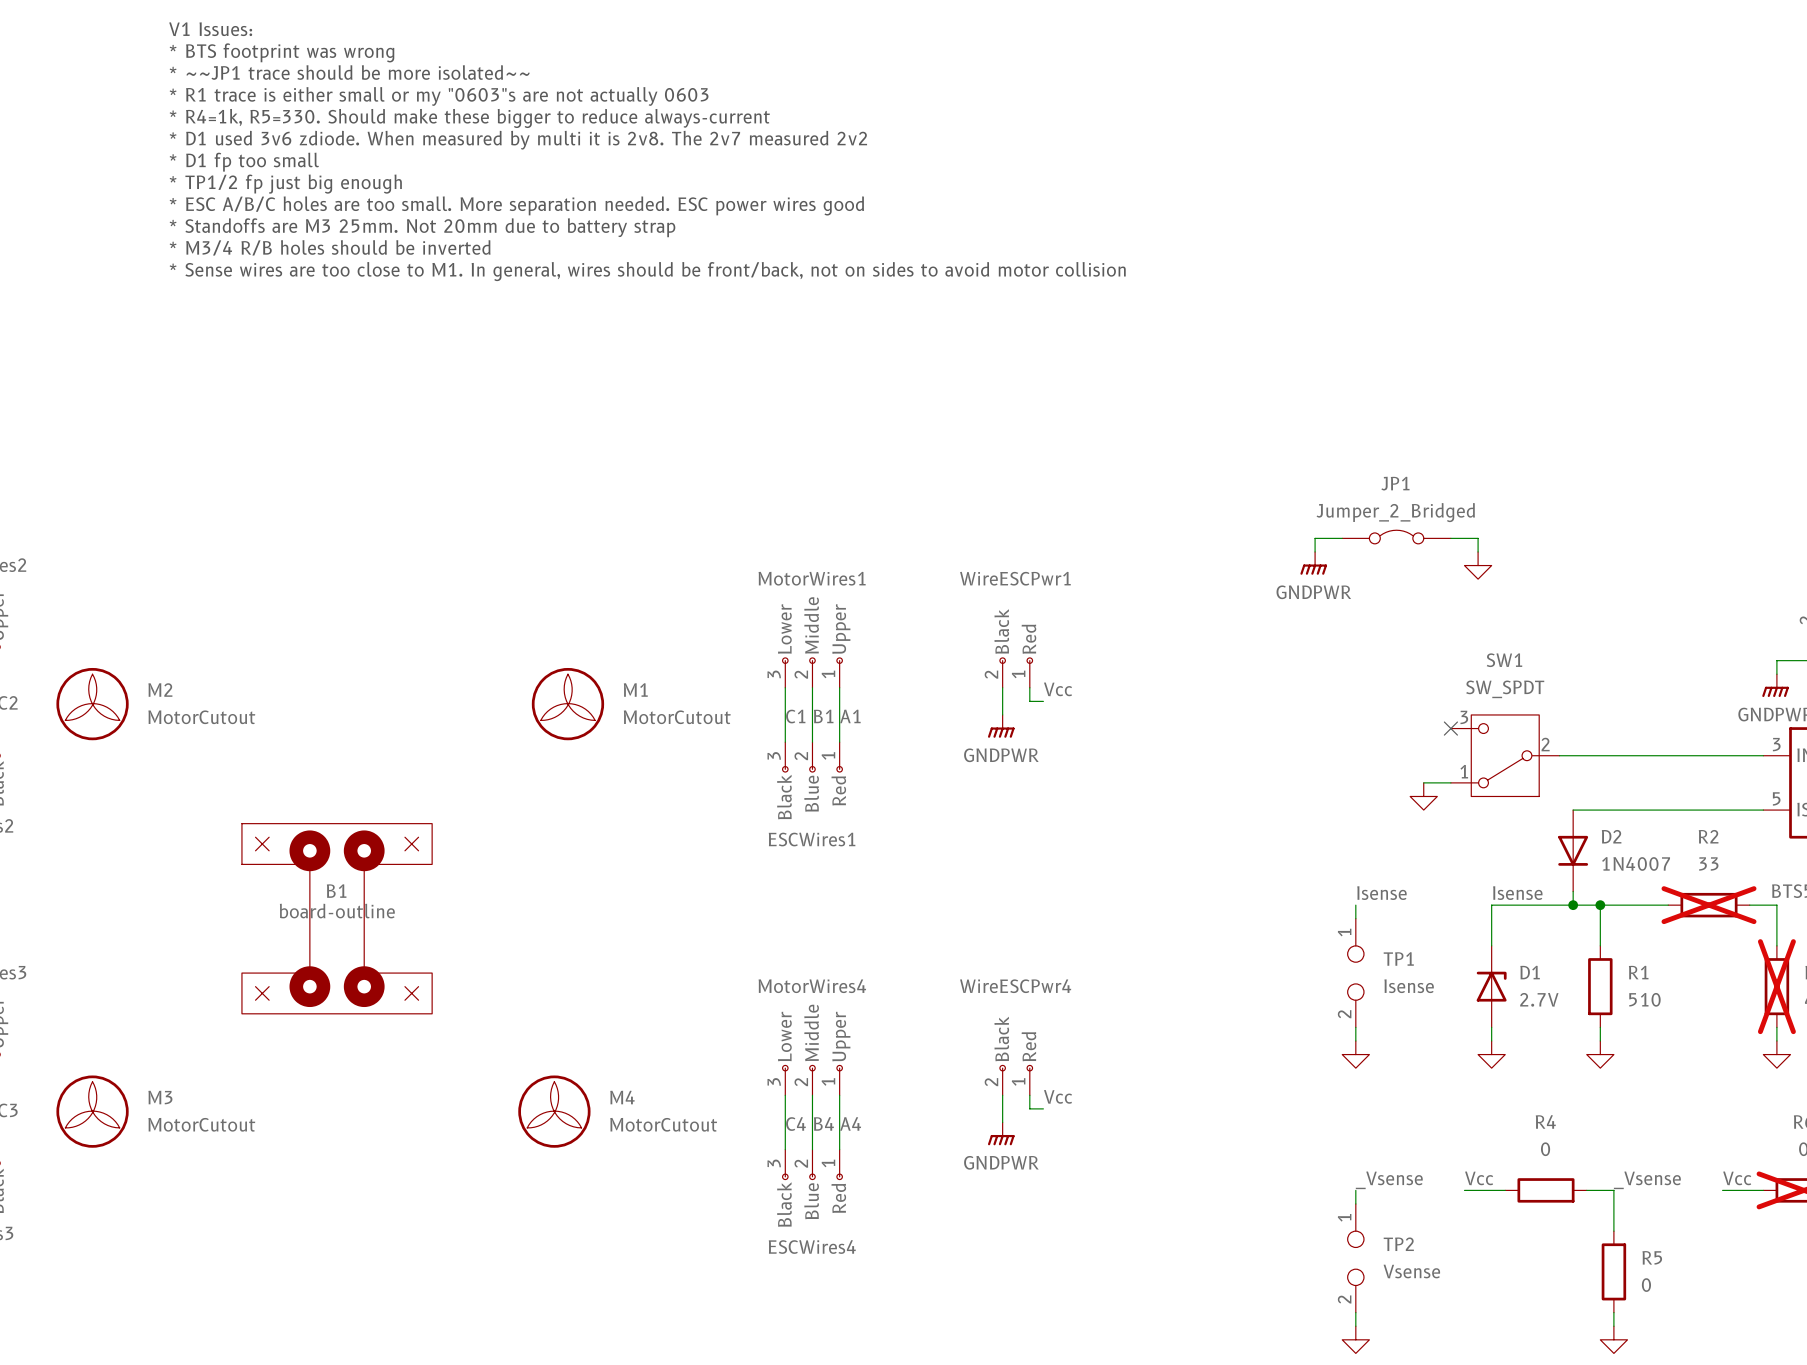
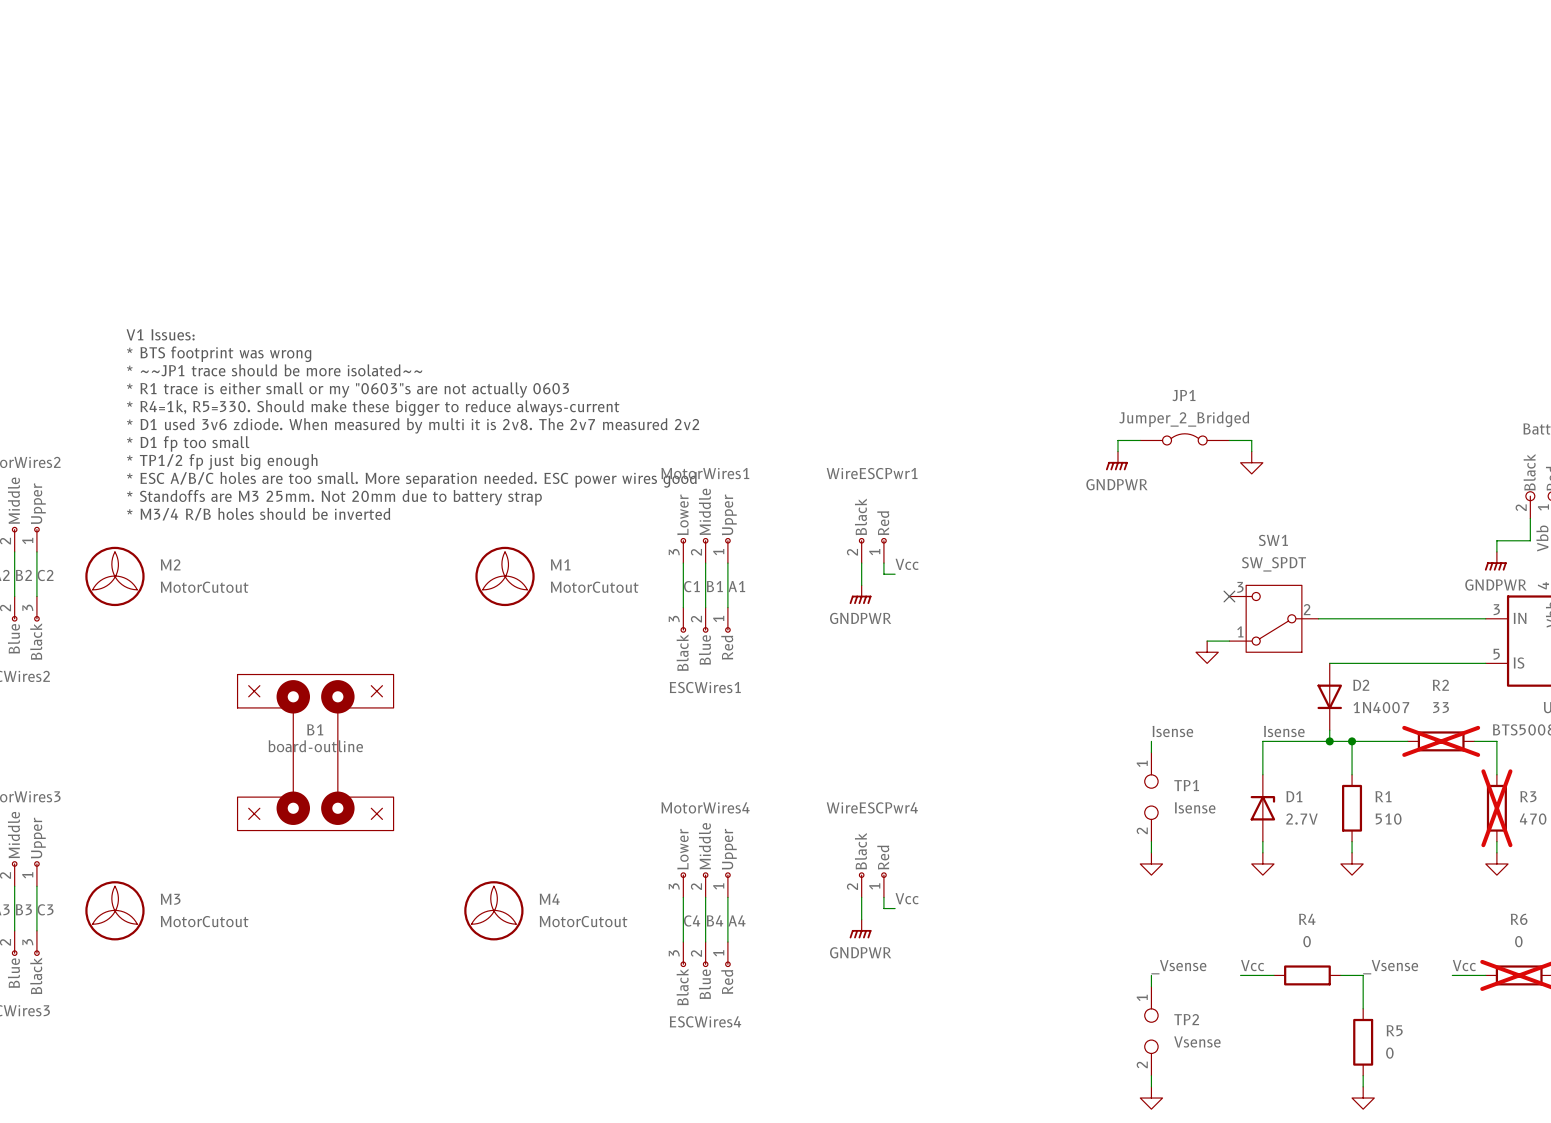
text: V1 Issues: (210, 29) -> none
text: * BTS footprint was wrong (282, 52) -> none
text: * ~~JP1 trace should be more isolated~~ (349, 72) -> none
text: * R1 trace is either small or my "0603"s are not actually 0603 (439, 96) -> none
text: * R4=1k, R5=330. Should make these bigger to reduce always-current (469, 118) -> none
text: * D1 used 3v6 zdiode. When measured by multi it is 2v8. The 2v7 measured 2v2 (518, 140) -> none
text: * D1 fp too small (244, 162) -> none
text: * TP1/2 fp just big enough (285, 184) -> none
text: * ESC A/B/C holes are too small. More separation needed. ESC power wires good (516, 205) -> none
text: * Standoffs are M3 25mm. Not 20mm due to battery strap (422, 227) -> none
text: * M3/4 R/B holes should be inverted (330, 247) -> none
text: * Sense wires are too close to M1. In general, wires should be front/back, not on sides to avoid motor collision (647, 271) -> none
text: none -> V1 Issues: (160, 334)
text: none -> * BTS footprint was wrong (219, 354)
text: none -> * ~~JP1 trace should be more isolated~~ (274, 370)
text: none -> * R1 trace is either small or my "0603"s are not actually 0603 (348, 390)
text: none -> * R4=1k, R5=330. Should make these bigger to reduce always-current (373, 408)
text: none -> * D1 used 3v6 zdiode. When measured by multi it is 2v8. The 2v7 measured 2v2 (413, 425)
text: none -> * D1 fp too small (188, 443)
text: none -> * TP1/2 fp just big enough (222, 461)
text: none -> * ESC A/B/C holes are too small. More separation needed. ESC power wires good (411, 479)
text: none -> * Standoffs are M3 25mm. Not 20mm due to battery strap (334, 497)
text: none -> * M3/4 R/B holes should be inverted (258, 514)

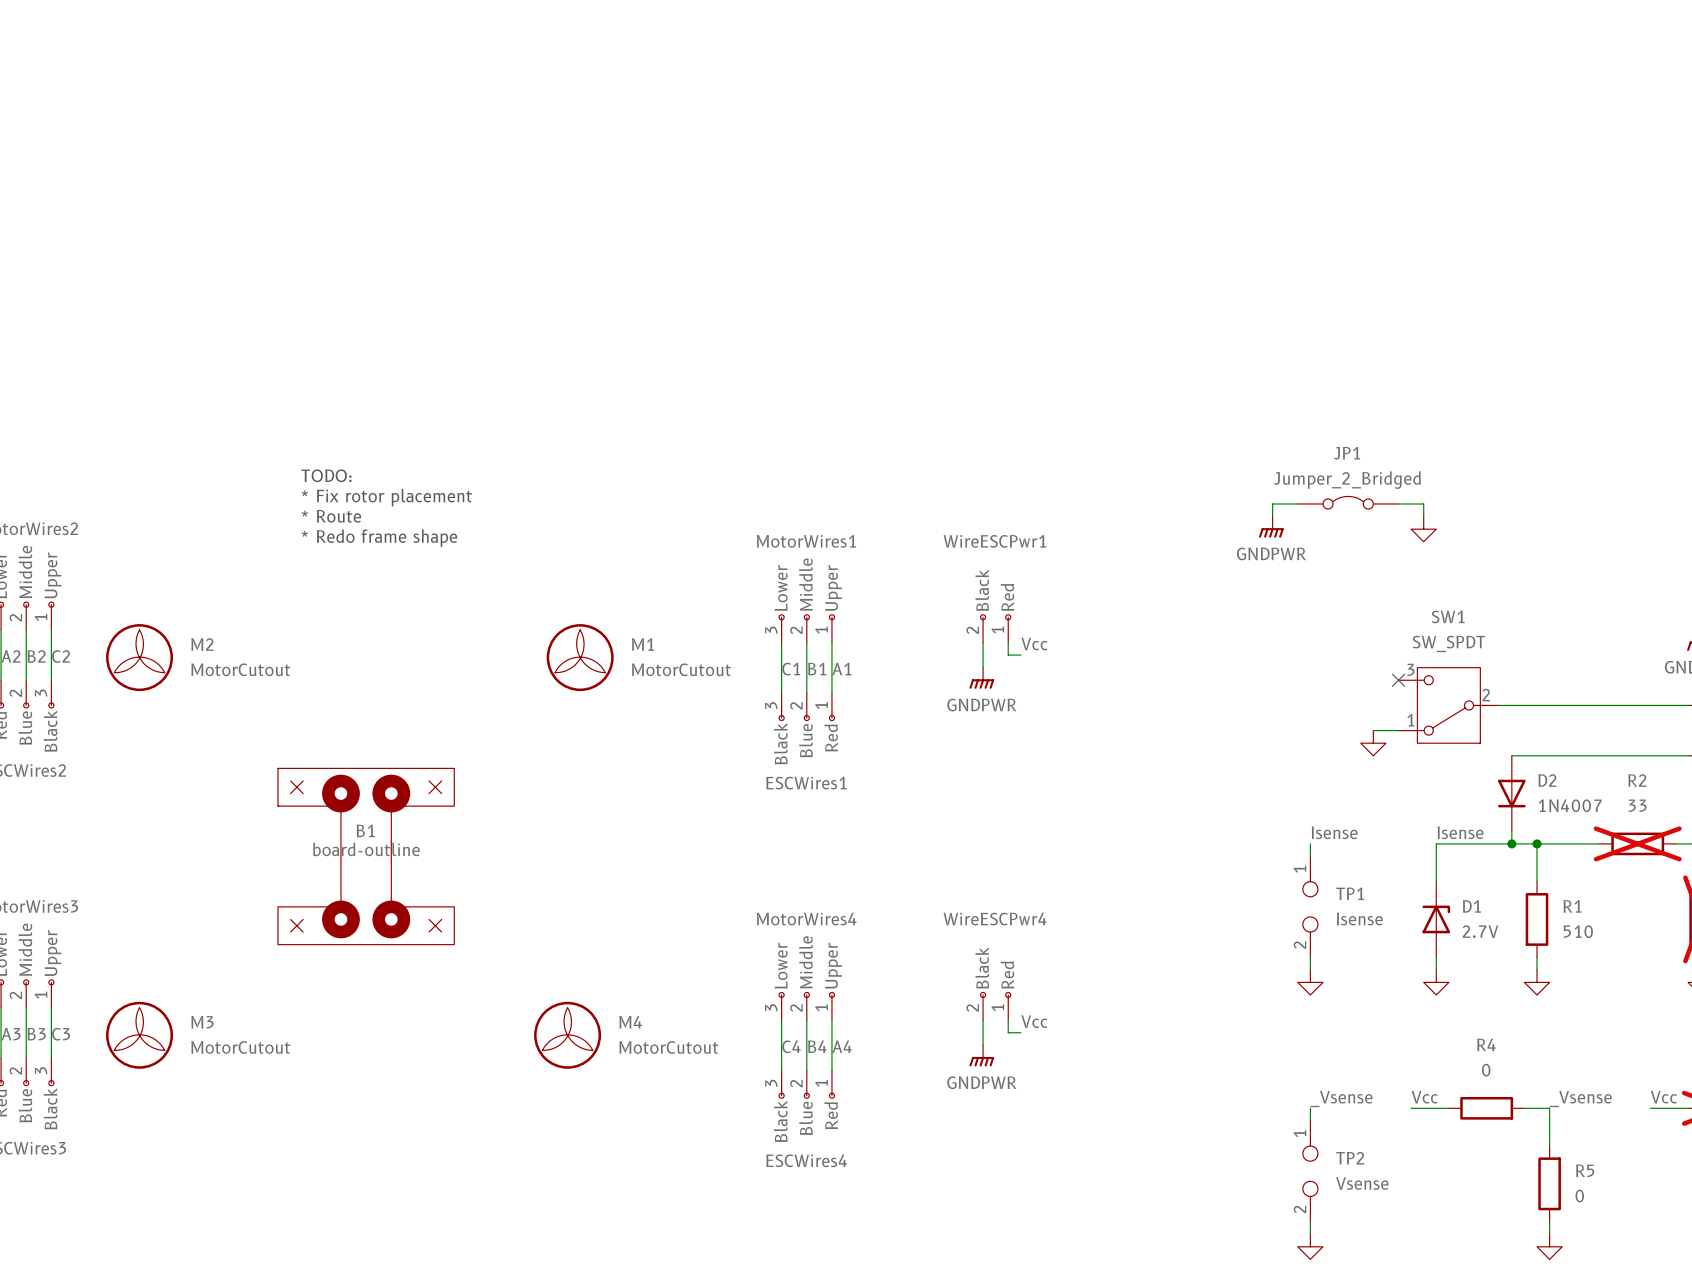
text: V1 Issues: (160, 334) -> none
text: * BTS footprint was wrong (219, 354) -> none
text: * ~~JP1 trace should be more isolated~~ (274, 370) -> none
text: * R1 trace is either small or my "0603"s are not actually 0603 (348, 390) -> none
text: * R4=1k, R5=330. Should make these bigger to reduce always-current (373, 408) -> none
text: none -> TODO: (326, 475)
text: * D1 used 3v6 zdiode. When measured by multi it is 2v8. The 2v7 measured 2v2 (413, 425) -> none
text: none -> * Fix rotor placement (386, 497)
text: * D1 fp too small (188, 443) -> none
text: none -> * Route (331, 516)
text: * TP1/2 fp just big enough (222, 461) -> none
text: none -> * Redo frame shape (379, 538)
text: * ESC A/B/C holes are too small. More separation needed. ESC power wires good (411, 479) -> none
text: * Standoffs are M3 25mm. Not 20mm due to battery strap (334, 497) -> none
text: * M3/4 R/B holes should be inverted (258, 514) -> none

